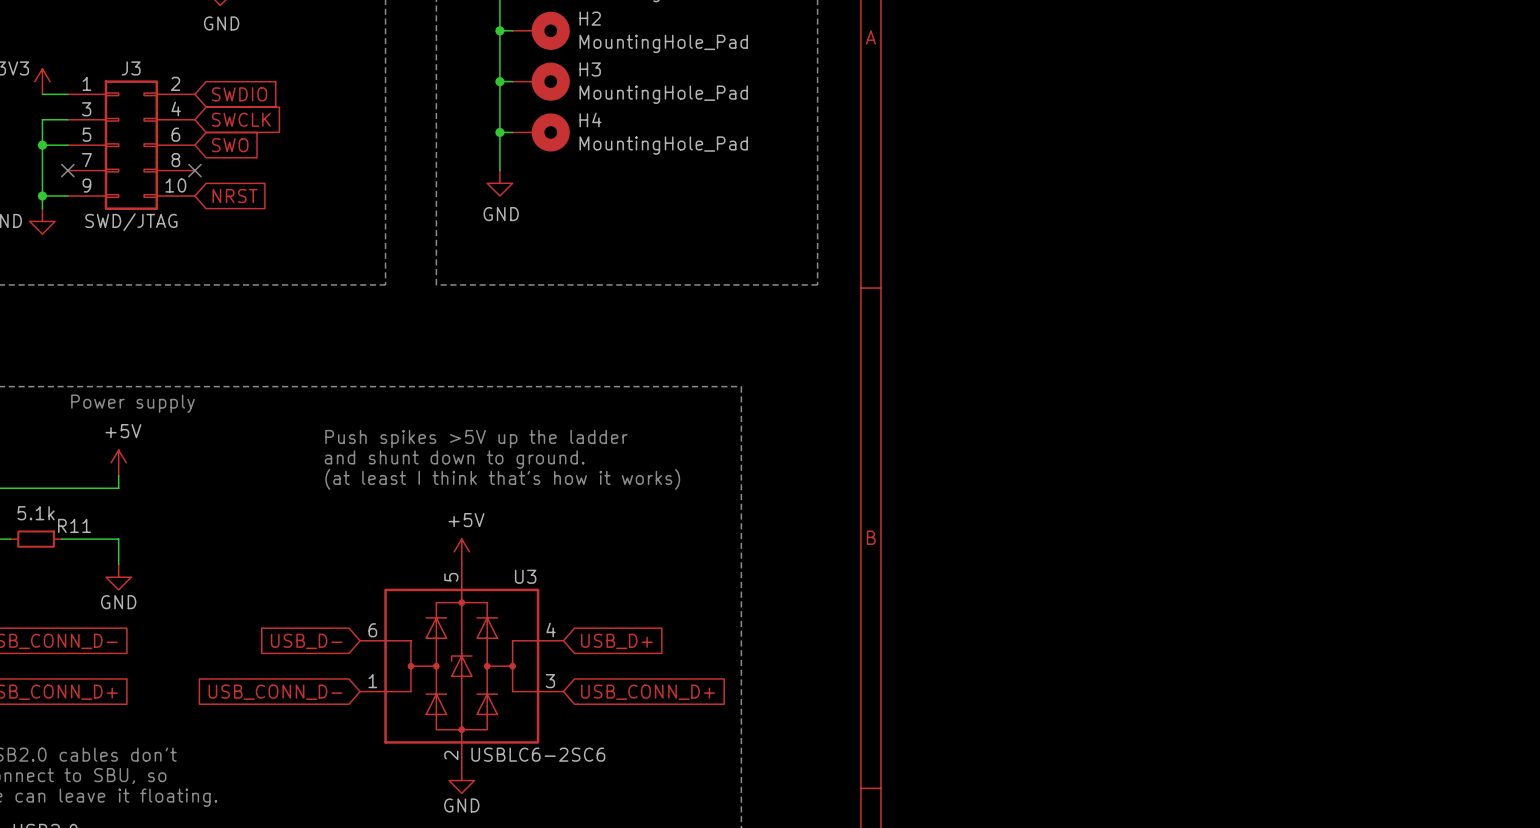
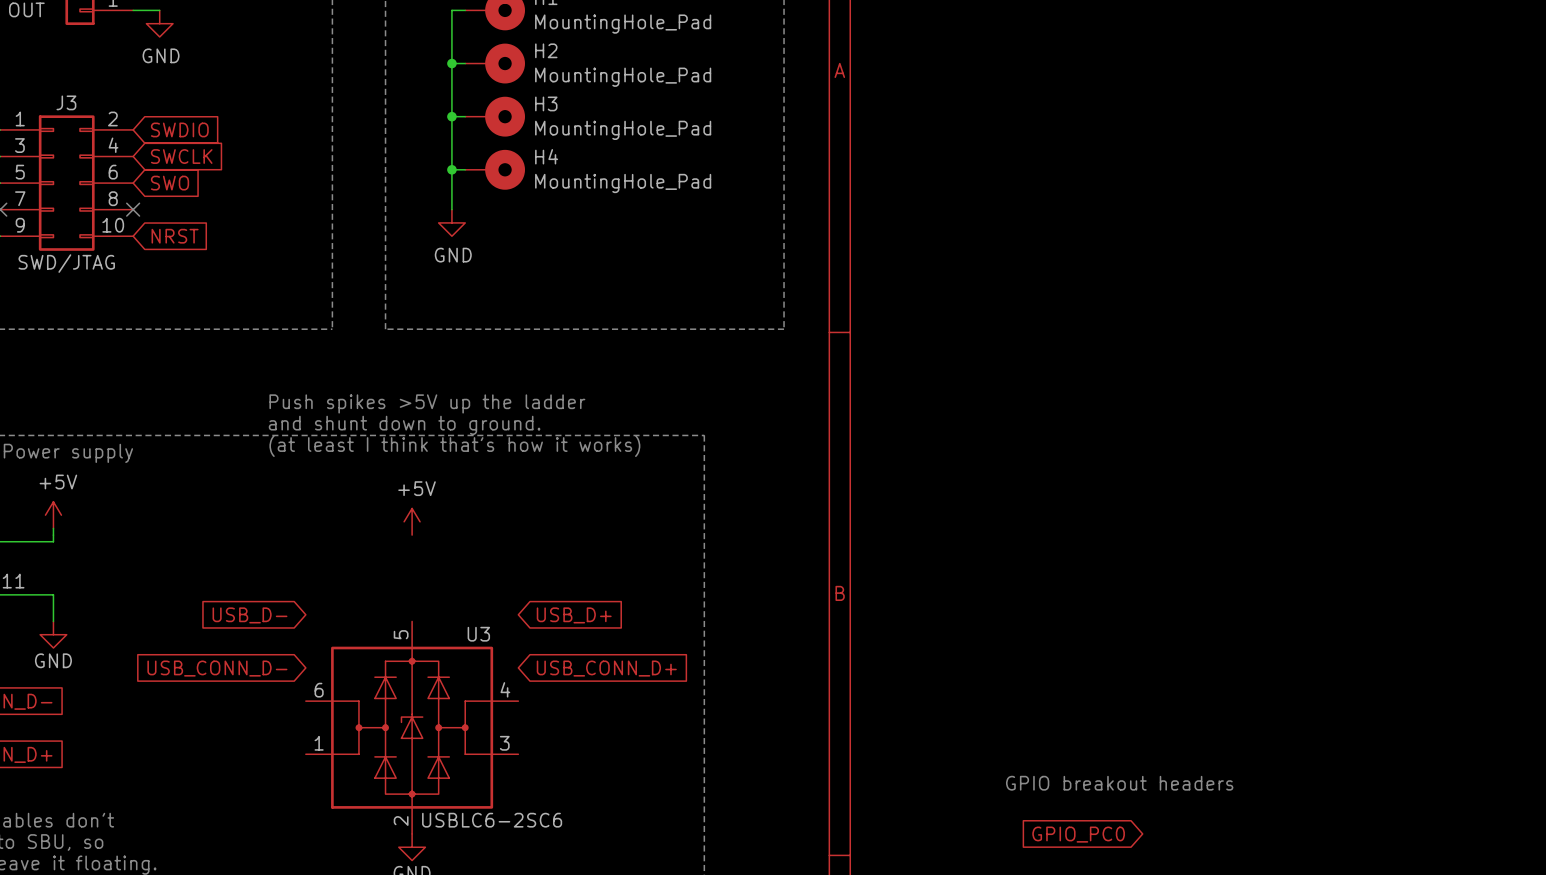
text position: Push spikes >5V up the ladder (476, 439) -> Push spikes >5V up the ladder (427, 403)
text position: and shunt down to ground. (454, 459) -> and shunt down to ground. (404, 425)
text position: (at least I think that's how it works) (502, 479) -> (at least I think that's how it works) (454, 446)
power symbol position: +5V (461, 551) -> +5V (412, 521)
global label position: USB_D- (306, 641) -> USB_D- (249, 615)
global label position: USB_D+ (616, 641) -> USB_D+ (574, 615)
global label position: USB_CONN_D- (275, 692) -> USB_CONN_D- (217, 668)
global label position: USB_CONN_D+ (648, 692) -> USB_CONN_D+ (606, 668)
text: none -> GPIO breakout headers (1119, 783)
global label: none -> GPIO_PC0 (1078, 834)

